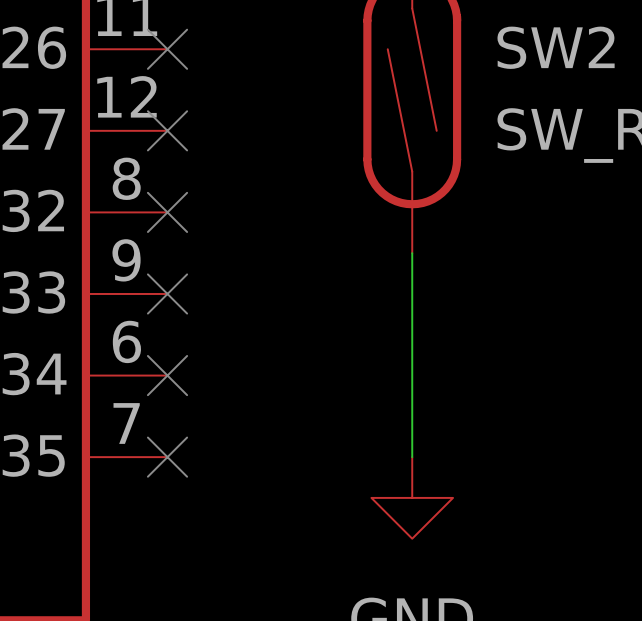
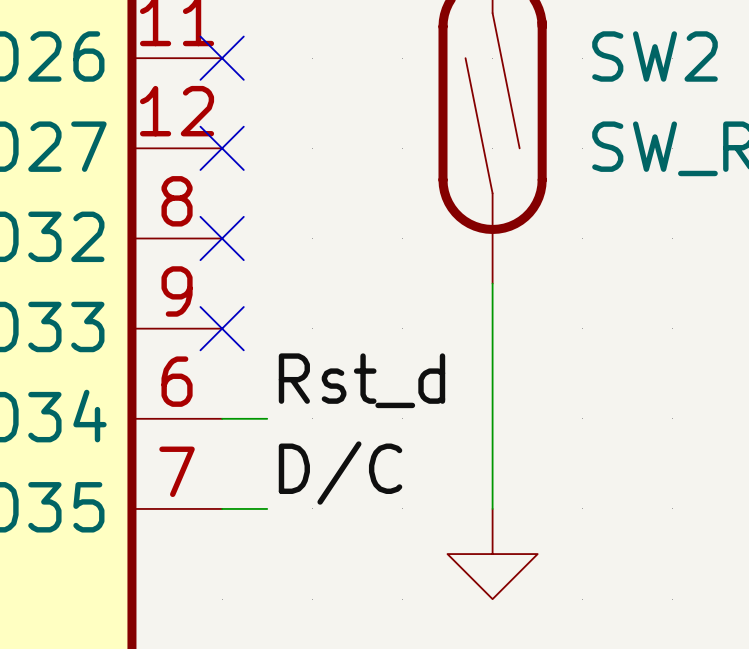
label: none -> Rst_d (361, 380)
wire: none -> (222, 418) (267, 418)
no-connect mark: (167, 375) -> none
label: none -> D/C (340, 473)
wire: none -> (222, 508) (267, 508)
no-connect mark: (167, 457) -> none

